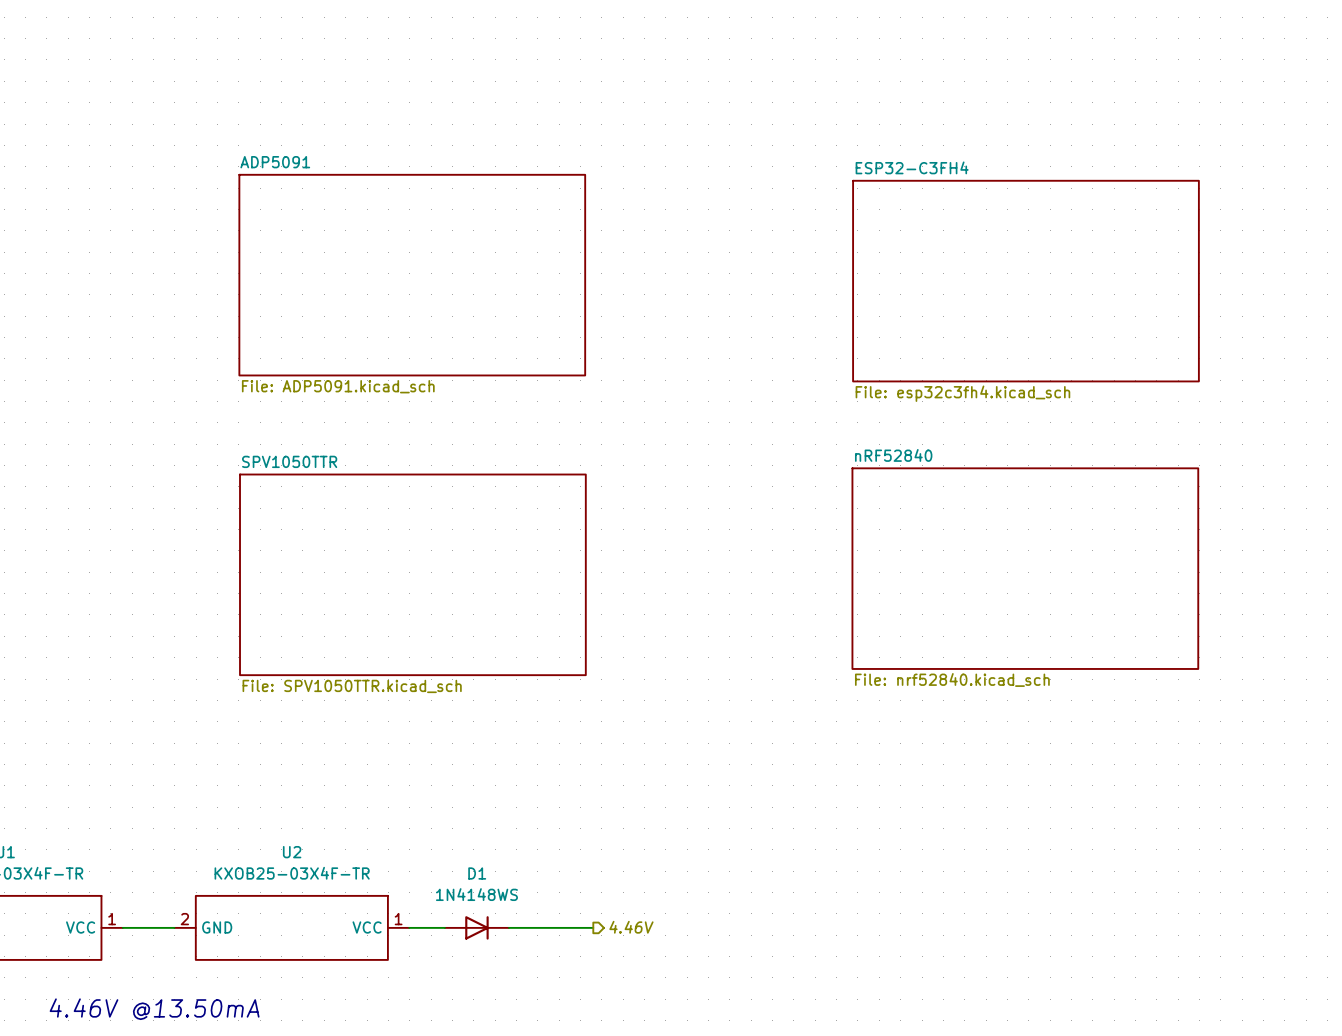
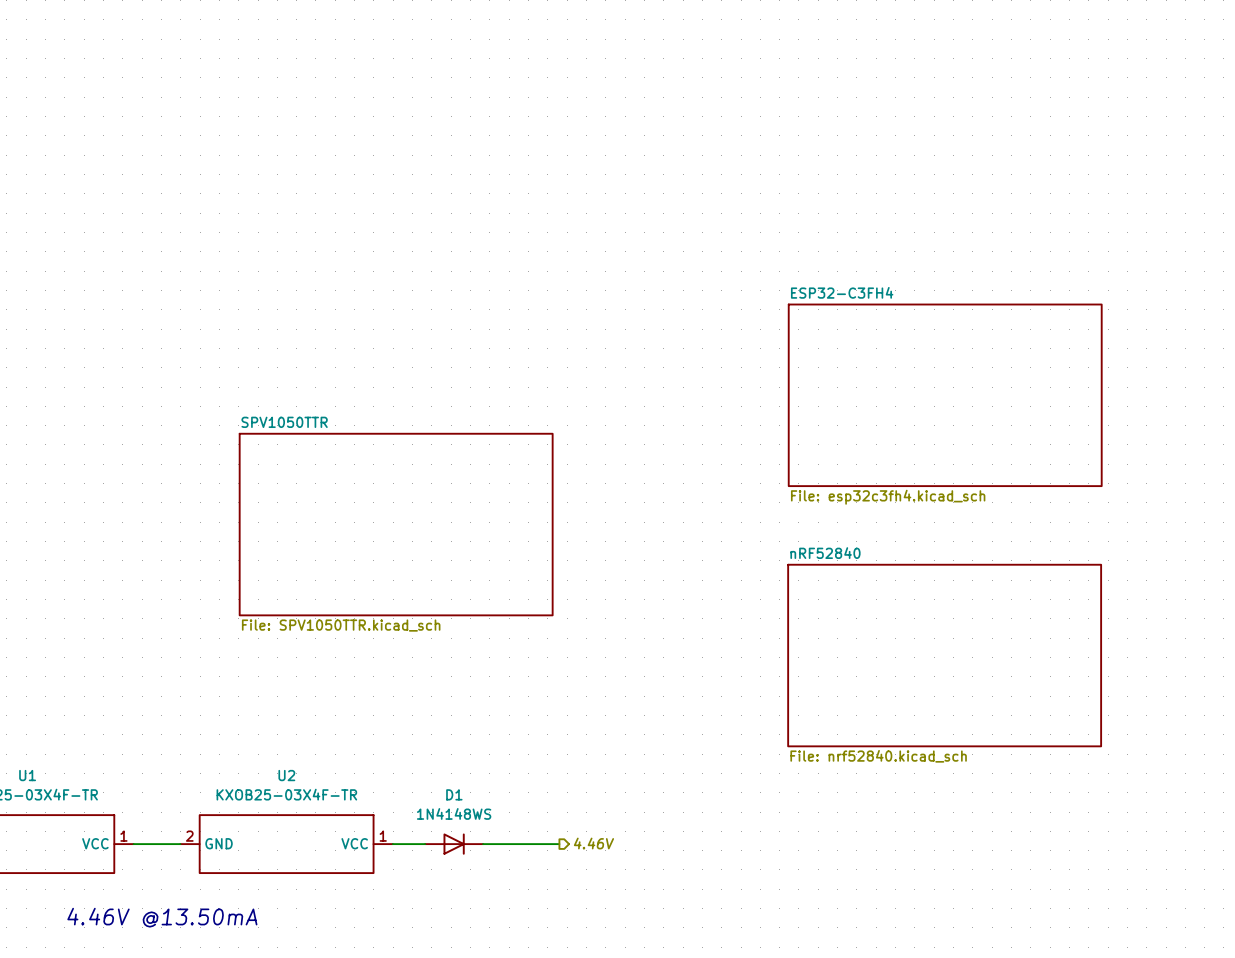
sheet ADP5091: File: ADP5091.kicad_sch (412, 275) -> none
sheet ESP32-C3FH4 position: (1025, 281) -> (945, 395)
sheet nRF52840 position: (1025, 568) -> (944, 655)

